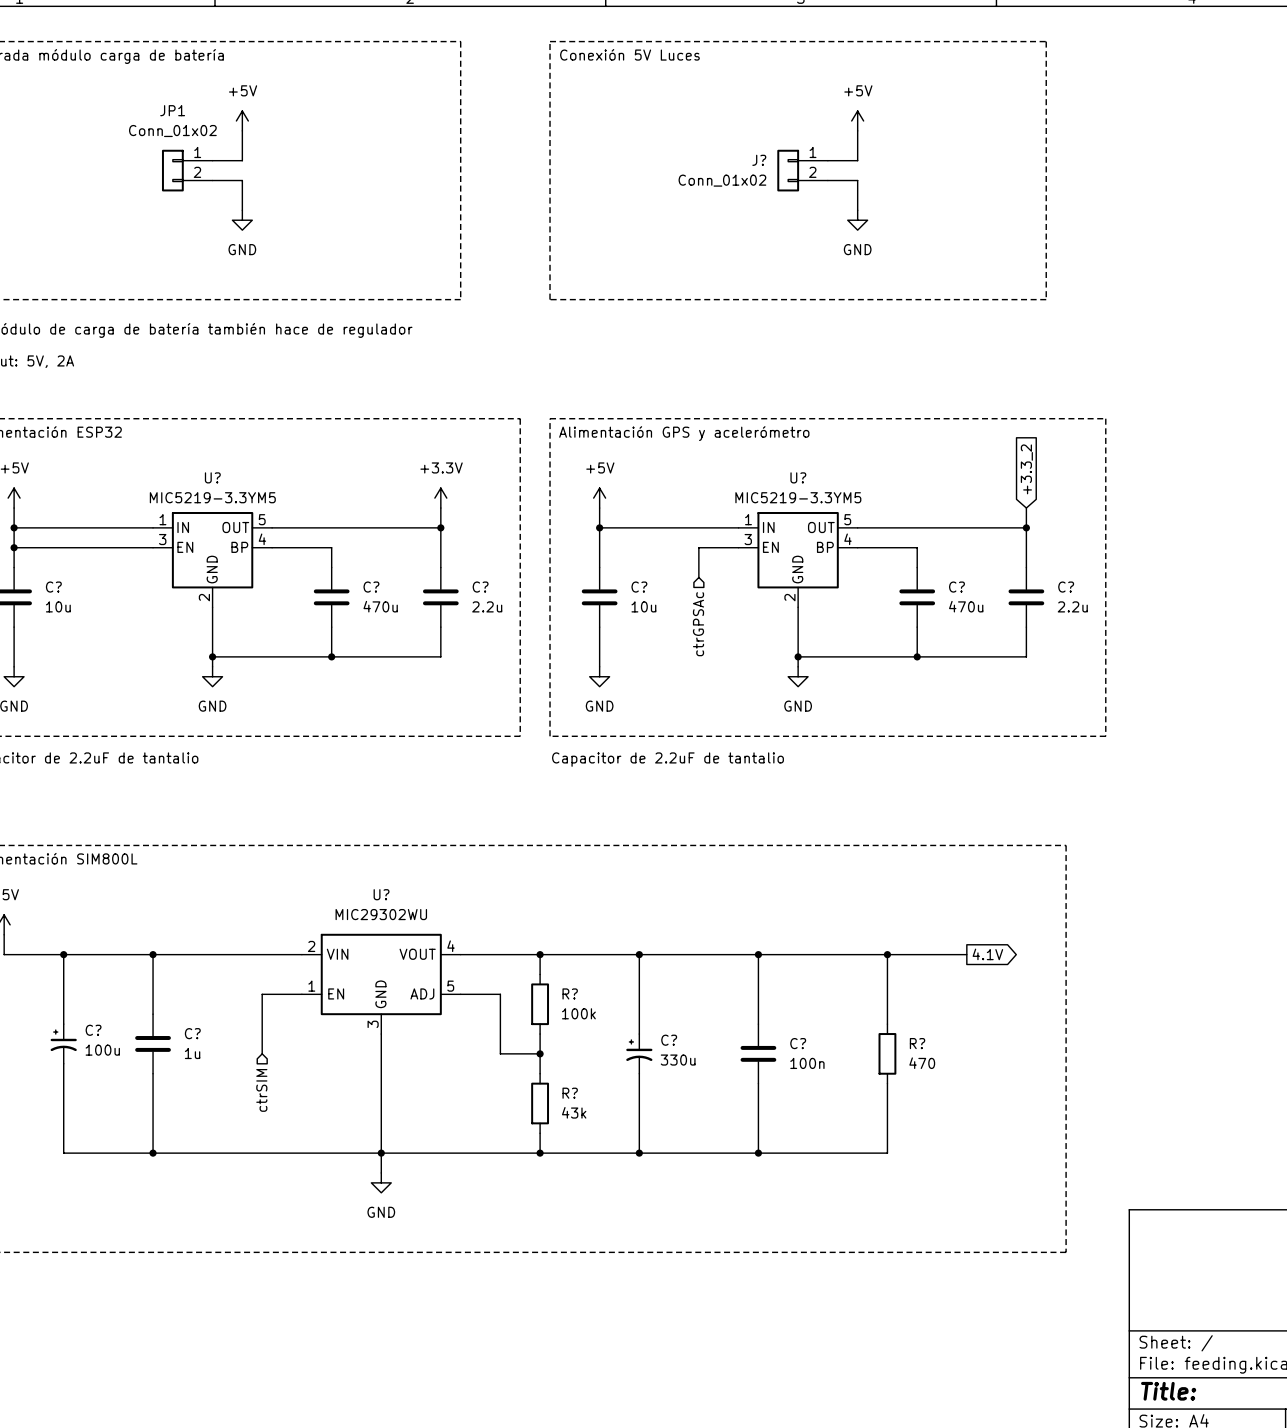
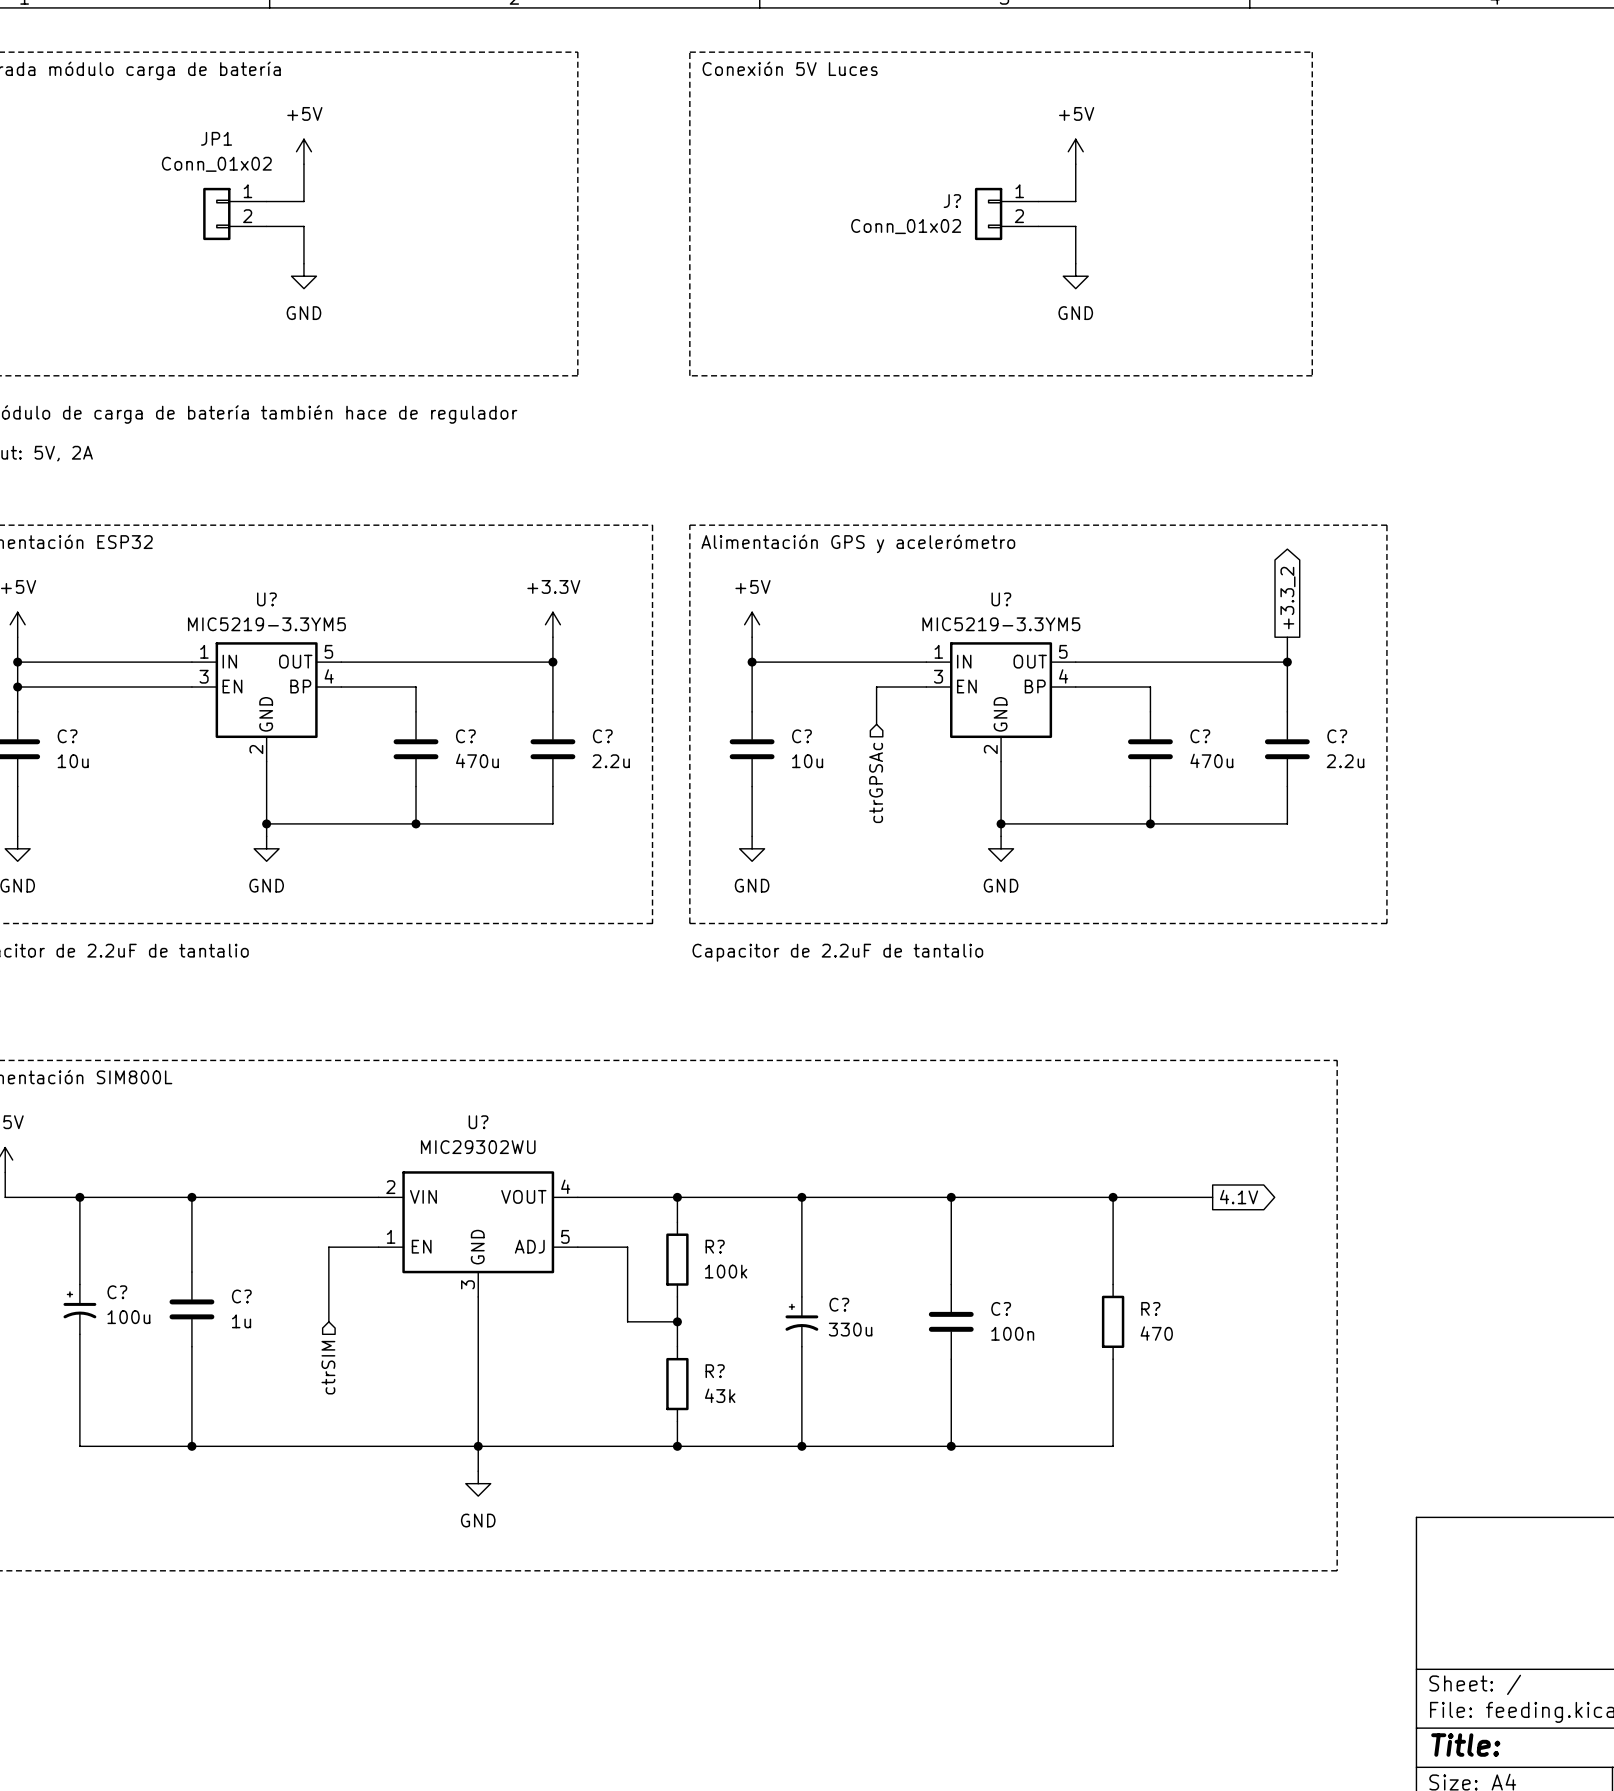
global label shape: input (1026, 469) -> output (1287, 598)

